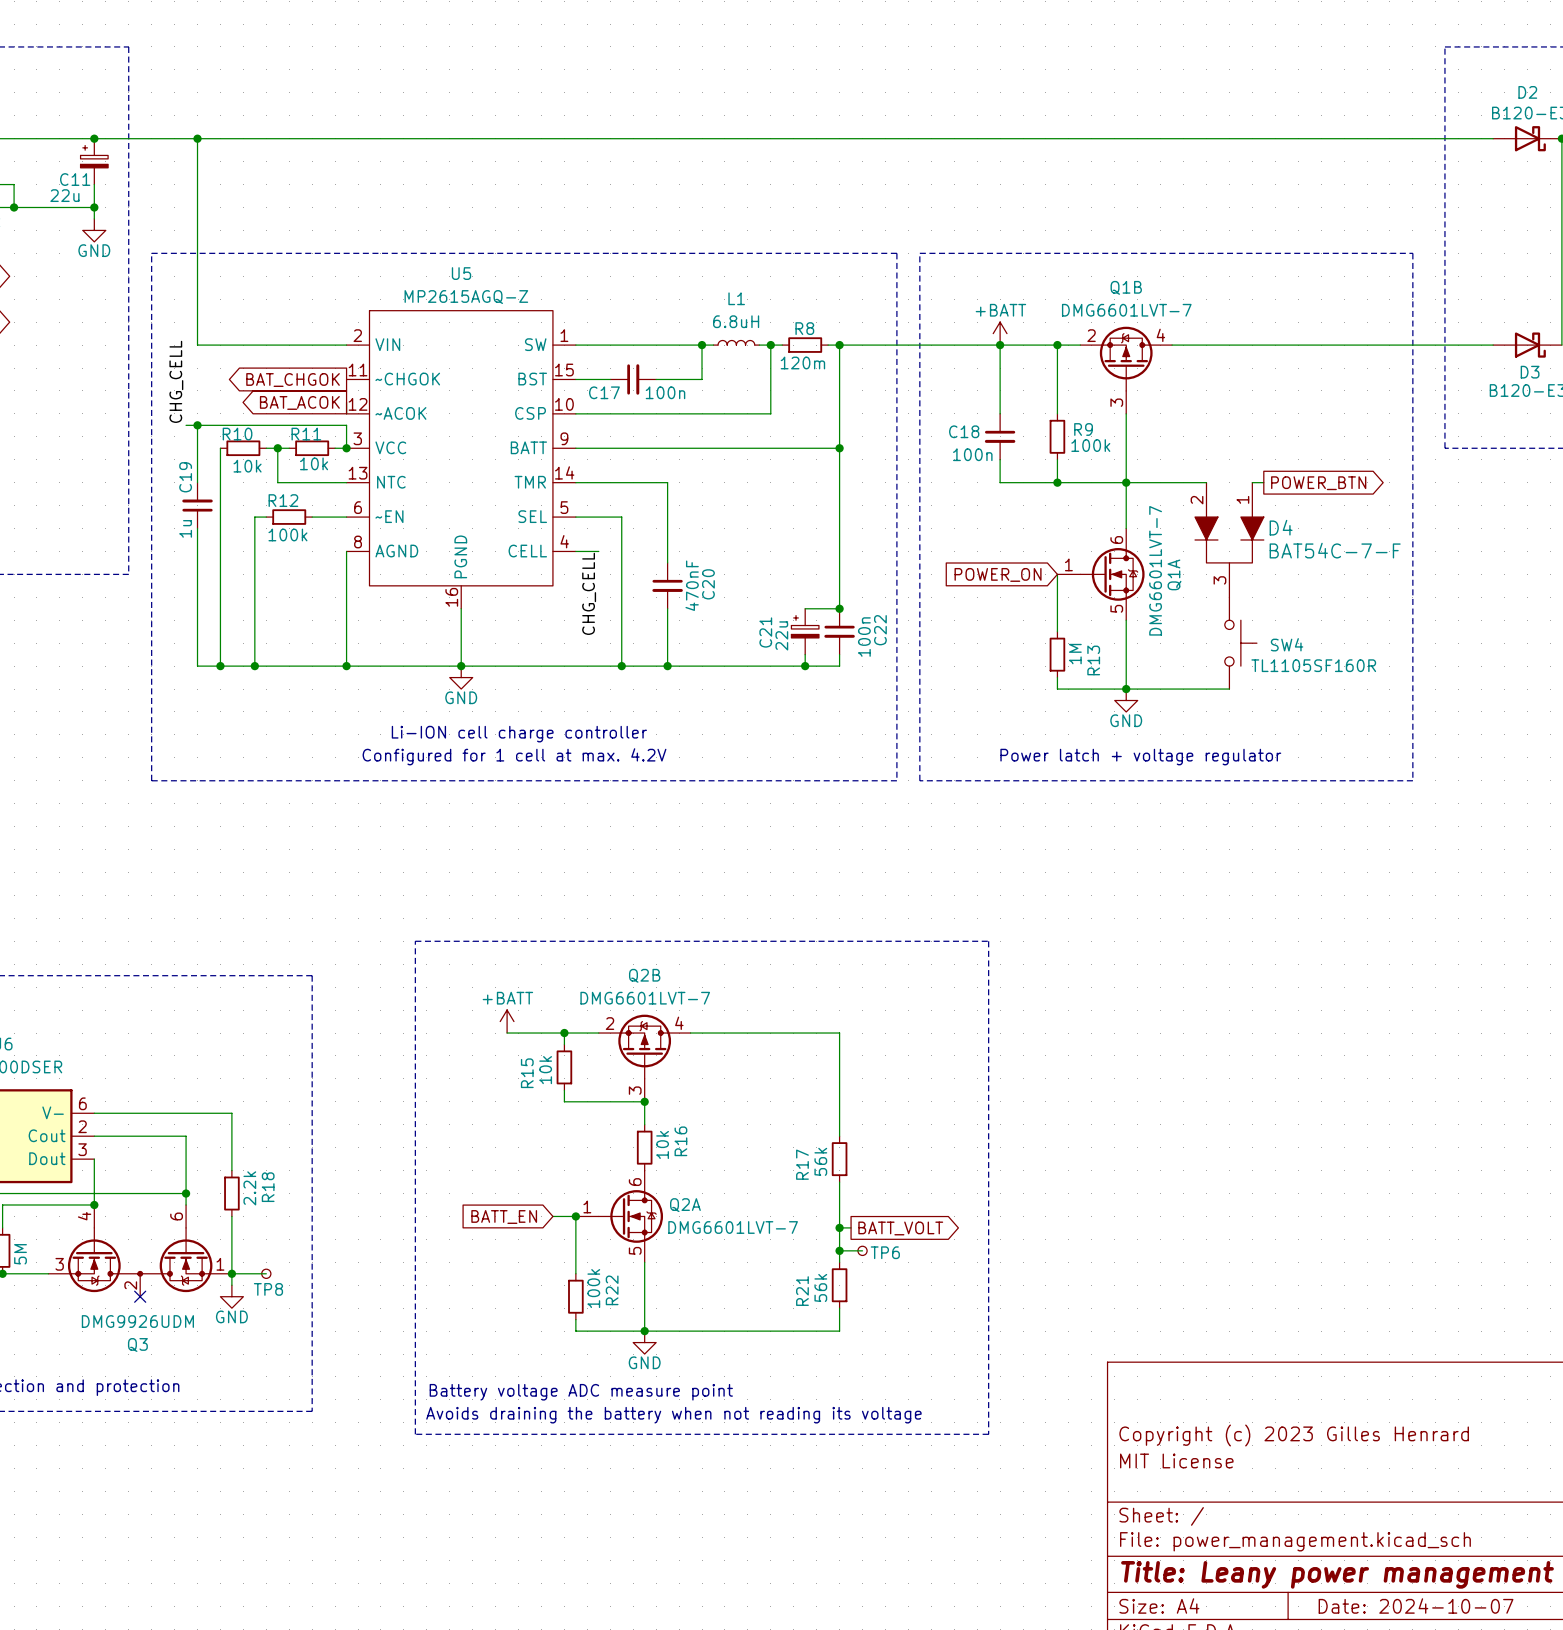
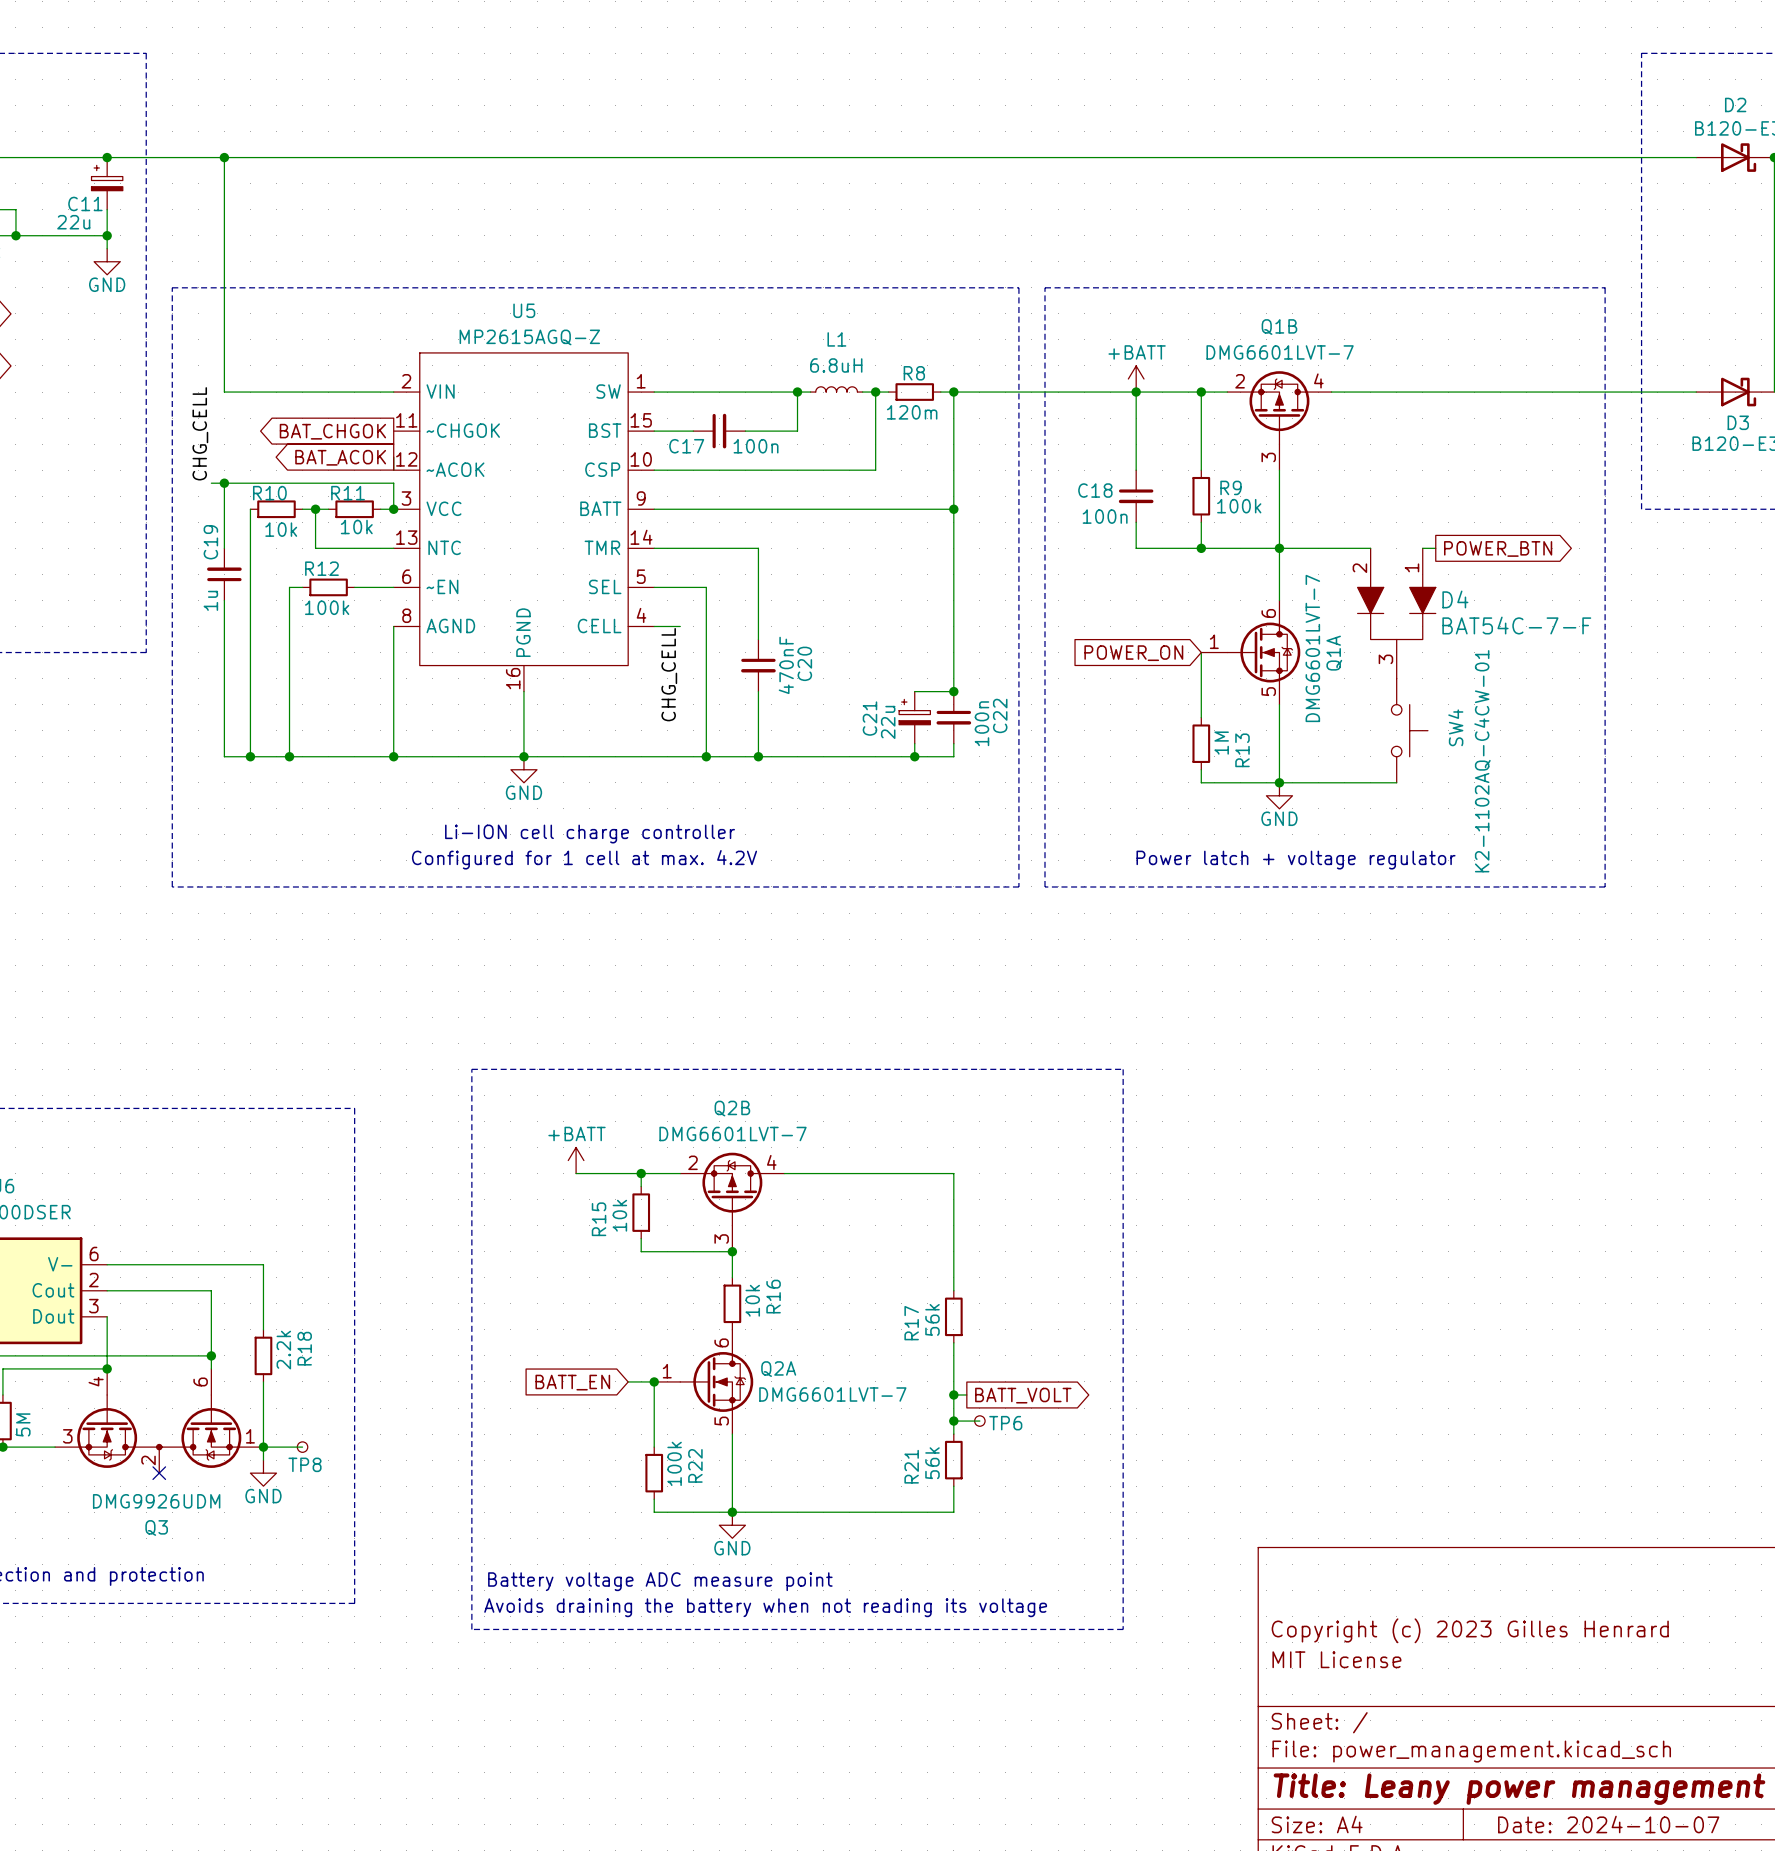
SW4 name rotation: 0° (1287, 644) -> 90° counterclockwise (1455, 727)
SW4 value: TL1105SF160R (1313, 665) -> K2-1102AQ-C4CW-01 (1482, 761)

